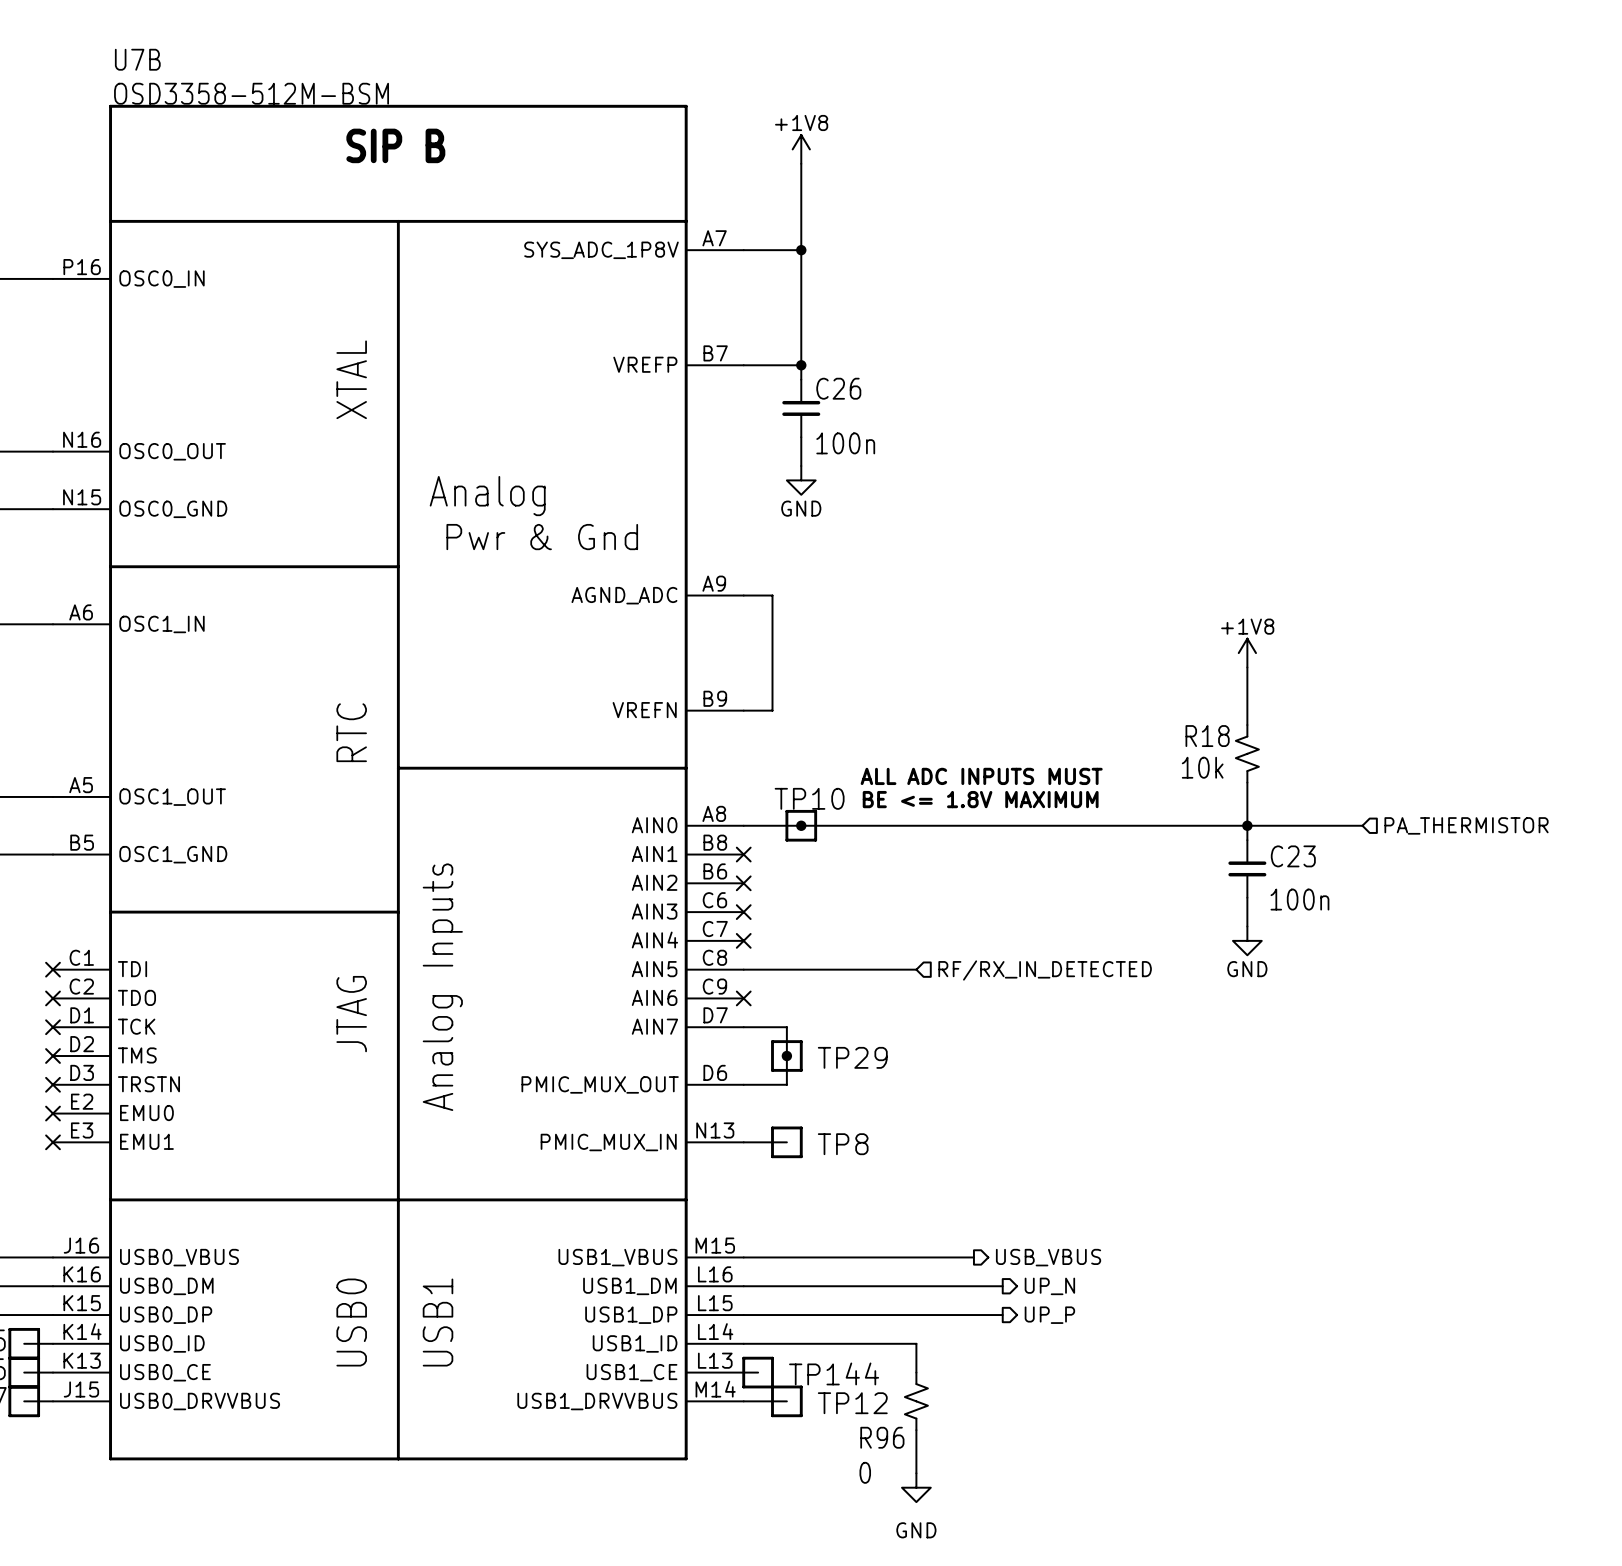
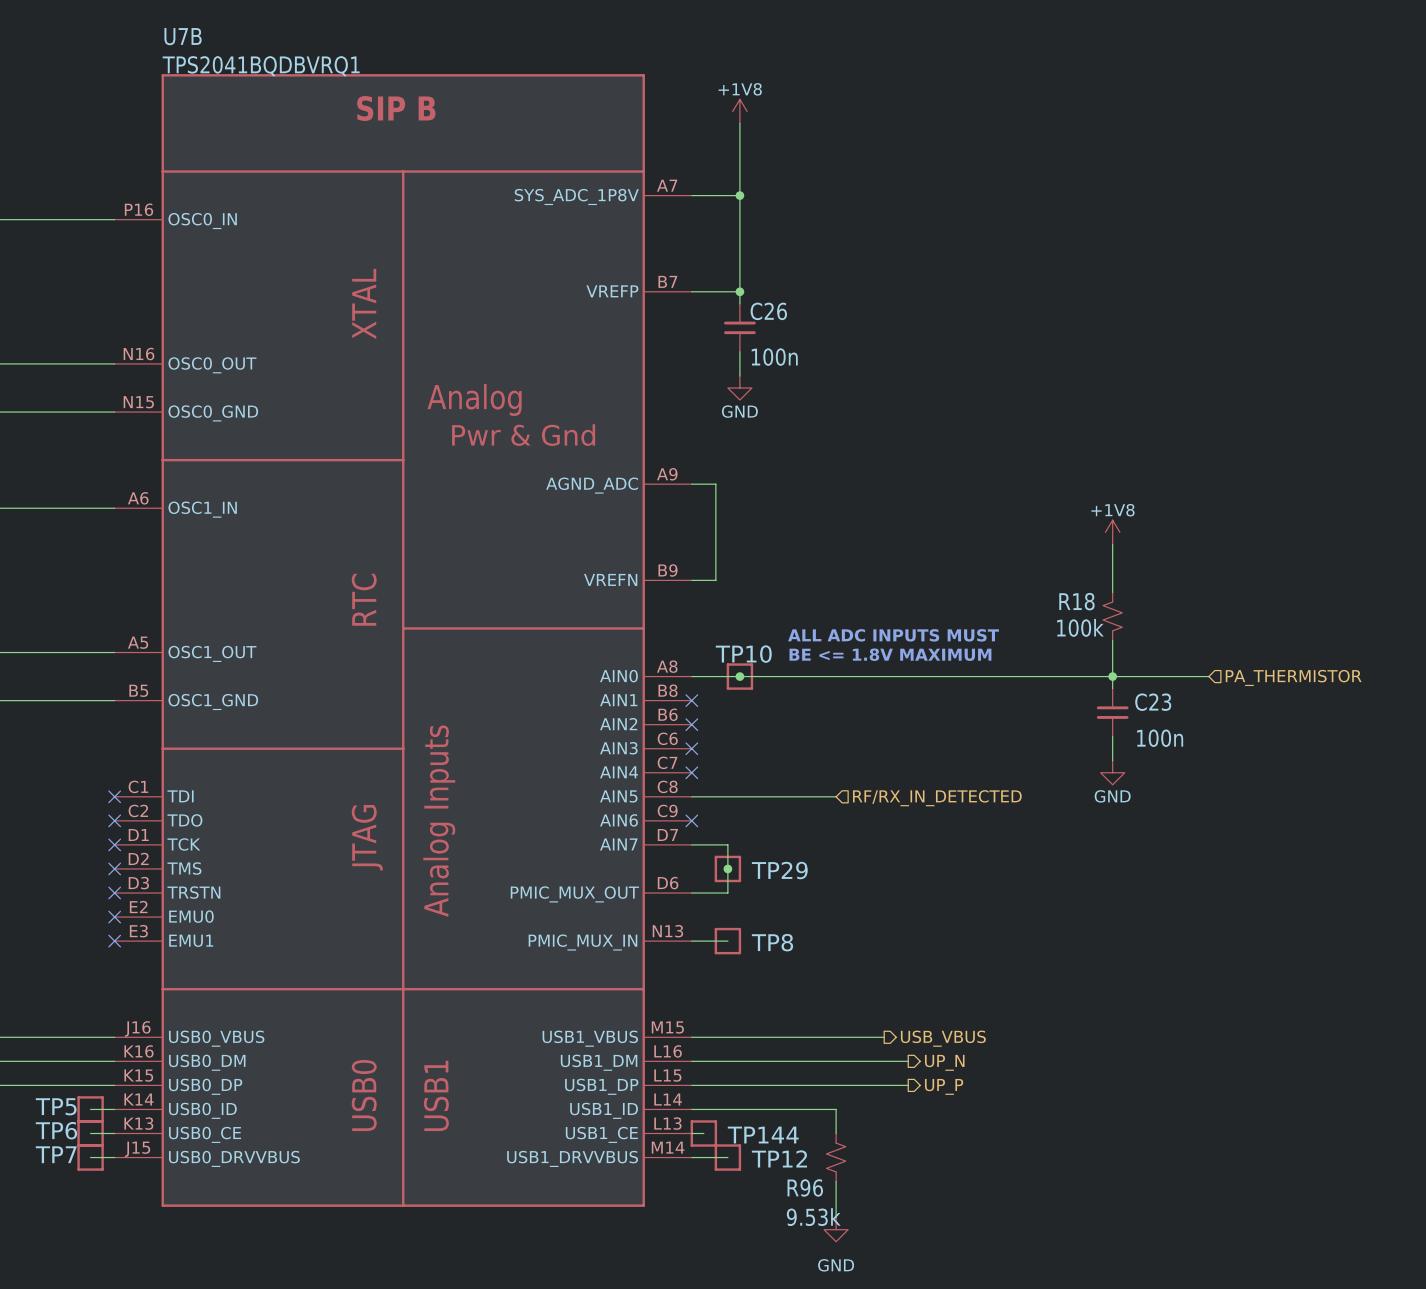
U7B value: OSD3358-512M-BSM (251, 93) -> TPS2041BQDBVRQ1 (261, 66)
R18 value: 10k (1202, 767) -> 100k (1080, 627)
R96 value: 0 (865, 1472) -> 9.53k (813, 1217)

